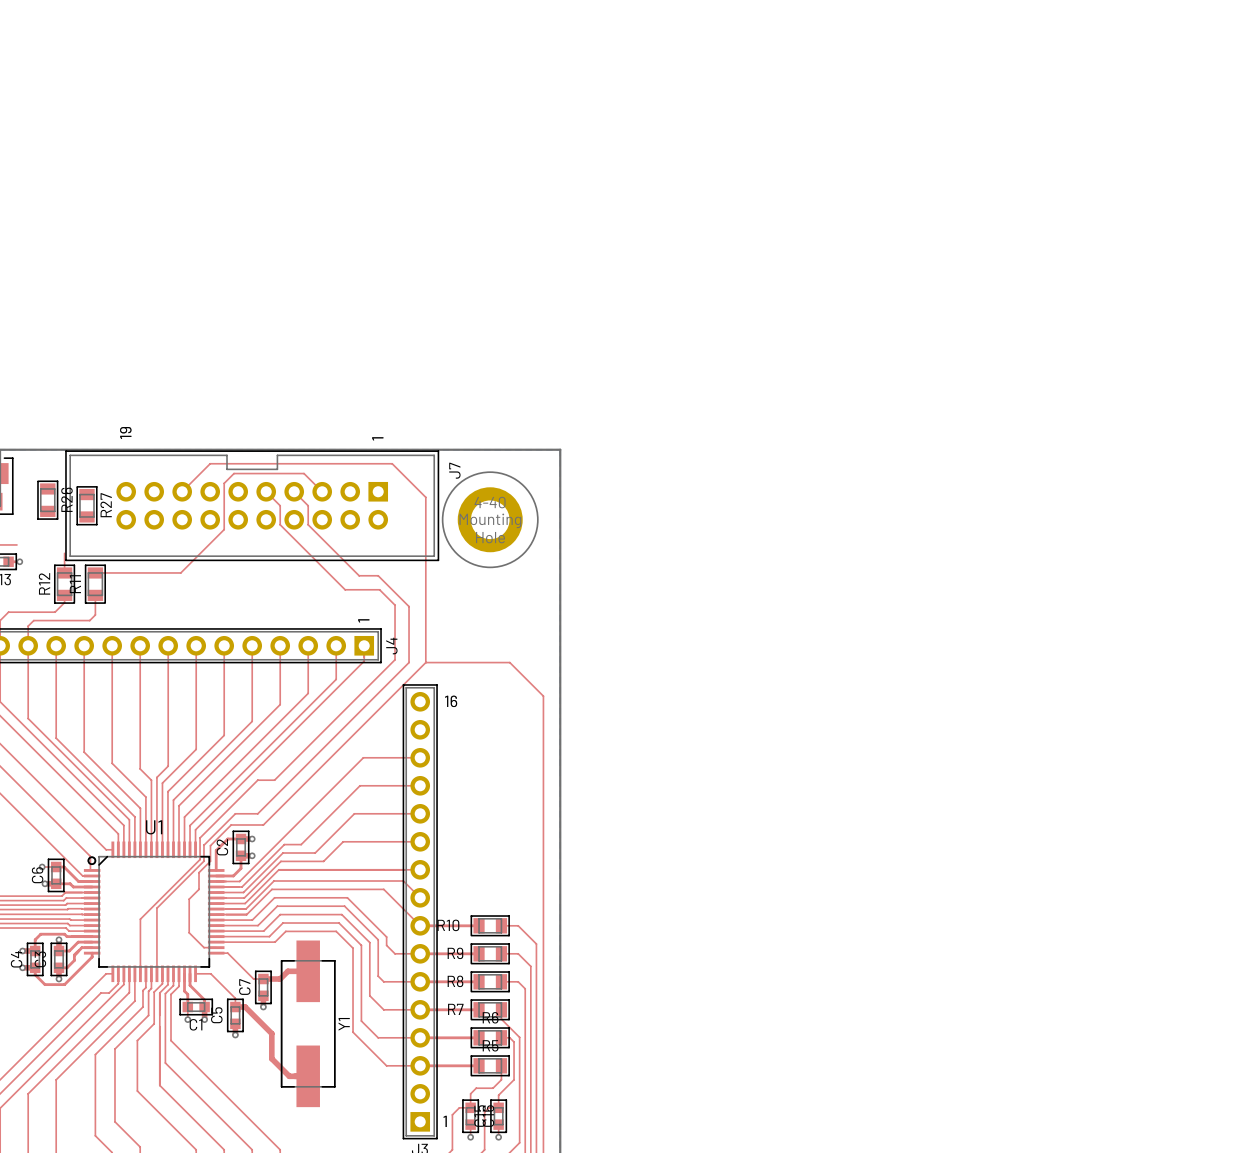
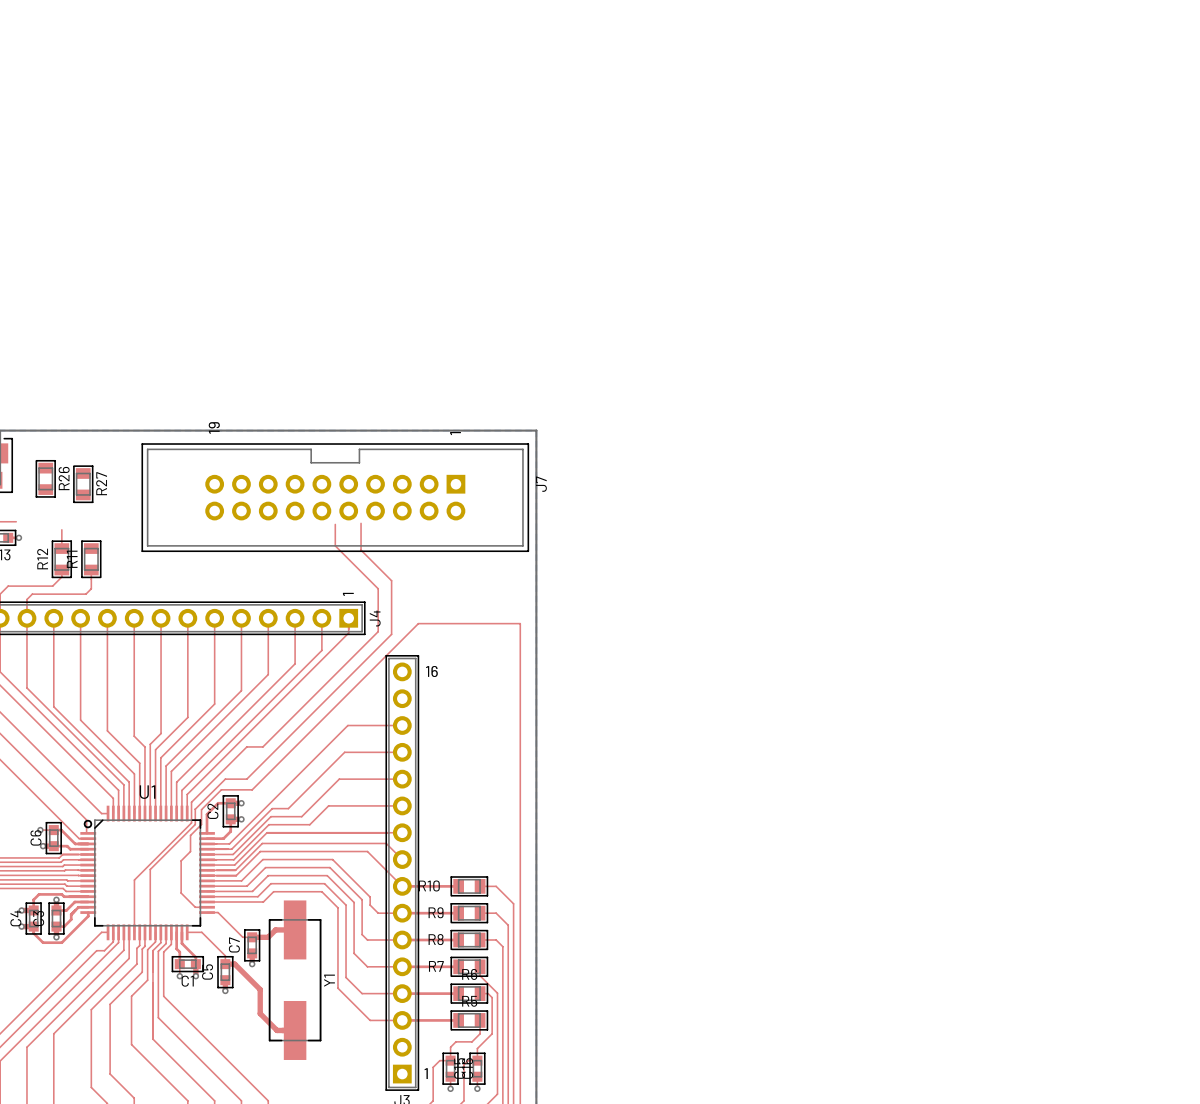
J7 footprint: [65, 450, 440, 562] -> [141, 443, 530, 552]
J7 name position: J7 (454, 470) -> J7 (541, 484)
top track: (182, 491) (210, 463) (392, 463) (425, 497) (425, 662) (509, 662) (543, 696) -> (407, 634) (418, 623) (520, 623) (520, 666)
top track: (266, 491) (280, 505) (280, 524) (345, 589) (379, 589) (395, 605) (395, 614) -> (335, 524) (335, 545) (378, 588)
top track: (294, 491) (308, 505) (308, 524) (359, 575) (378, 575) -> (361, 523) (362, 551)
top track: (322, 491) (304, 473) (234, 473) (224, 483) (224, 529) (180, 572) (95, 572) -> none
part: (490, 519) -> none

